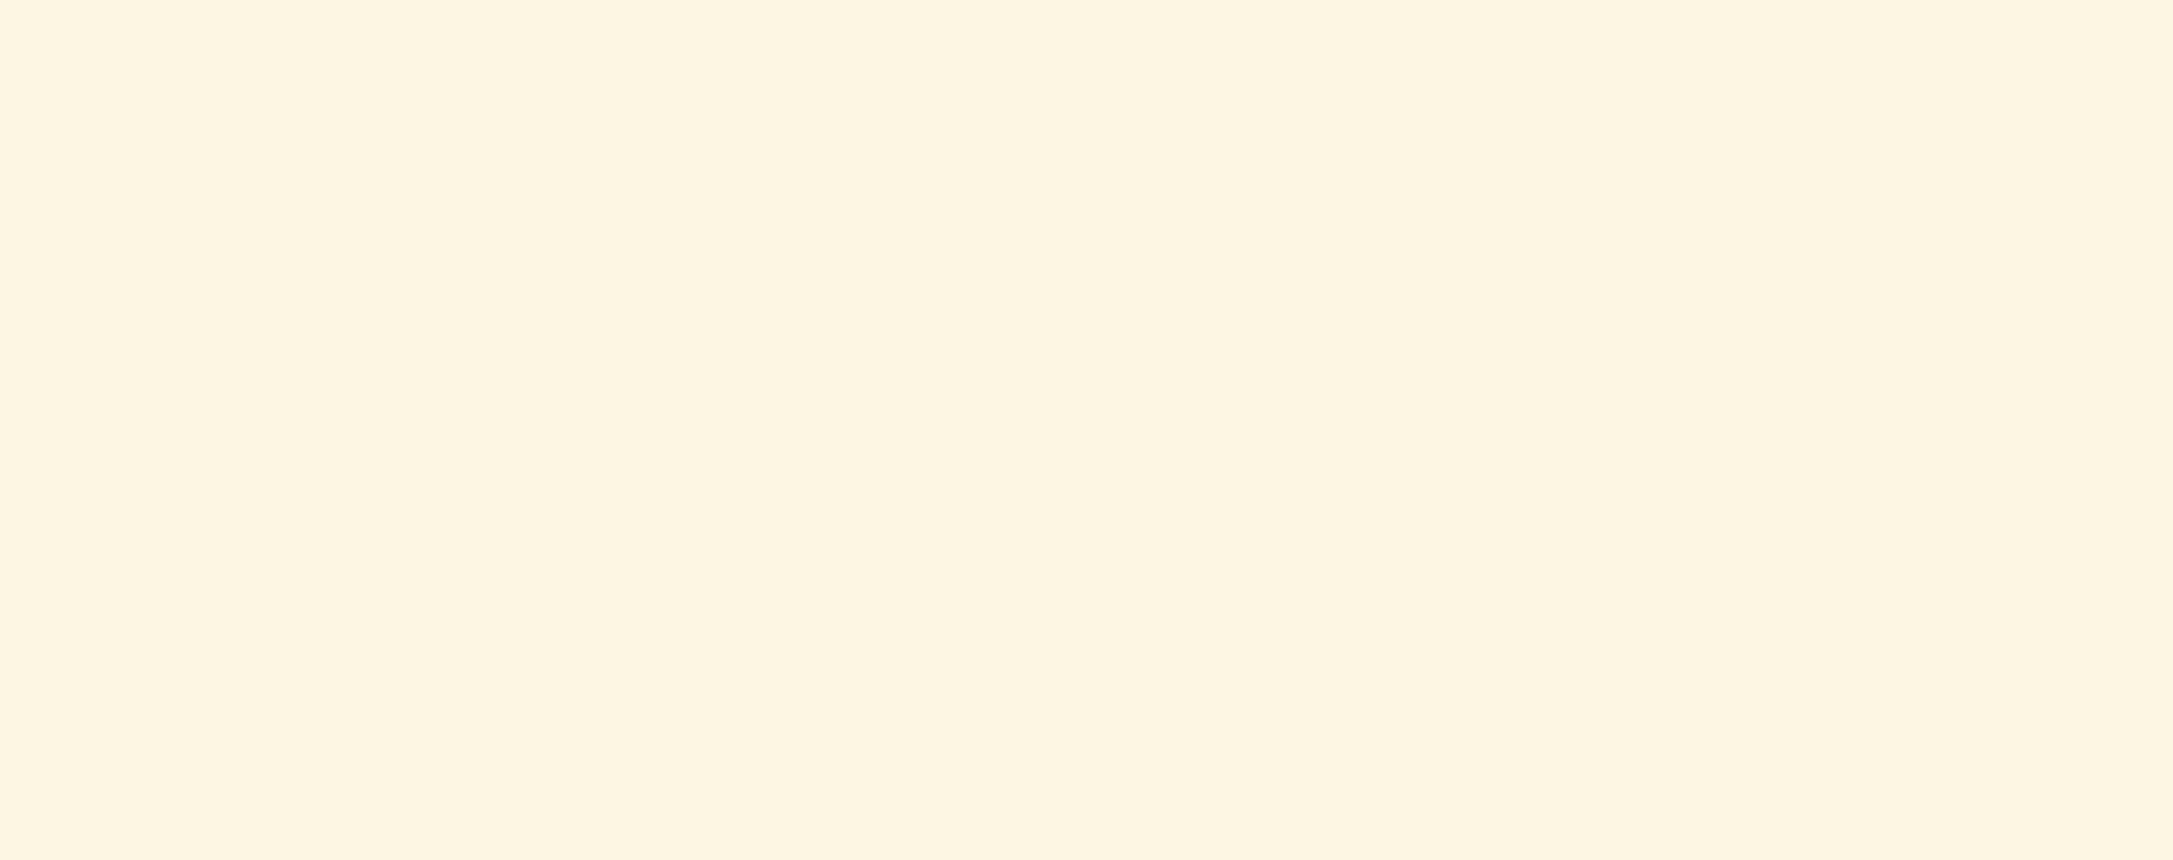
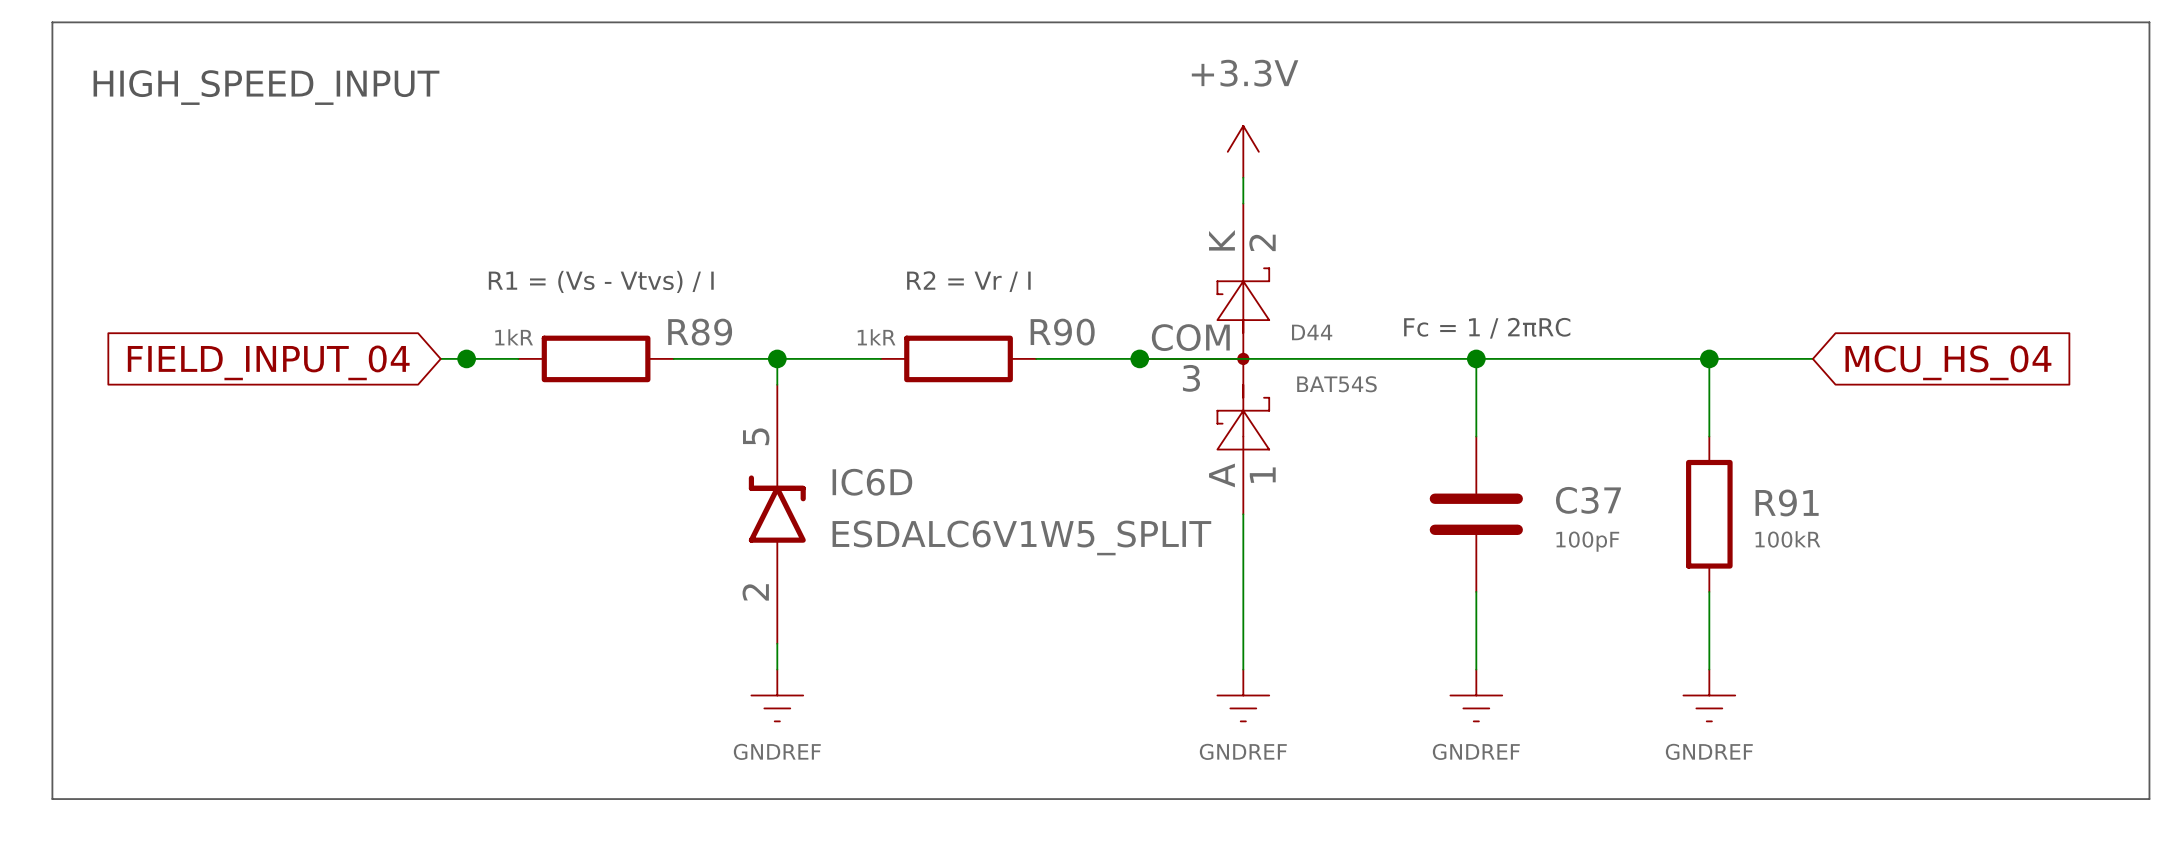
line: none -> (52, 22) (2149, 22) (2149, 799) (52, 799) (52, 22)
text: none -> HIGH_SPEED_INPUT (266, 87)
power symbol: none -> +3.3V (1243, 151)
wire: none -> (1243, 177) (1243, 203)
text: none -> R1 = (Vs - Vtvs) / I (601, 281)
text: none -> R2 = Vr / I (968, 281)
text: none -> Fc = 1 / 2πRC (1487, 328)
wire: none -> (440, 358) (518, 358)
junction: none -> (466, 358)
R89: none -> 1kR (596, 358)
wire: none -> (673, 358) (880, 358)
wire: none -> (777, 358) (777, 384)
junction: none -> (777, 358)
R90: none -> 1kR (958, 358)
wire: none -> (1036, 358) (1812, 358)
junction: none -> (1139, 358)
D44: none -> BAT54S (1204, 358)
wire: none -> (1476, 358) (1476, 436)
junction: none -> (1476, 358)
wire: none -> (1709, 358) (1709, 436)
junction: none -> (1709, 358)
global label: none -> FIELD_INPUT_04 (268, 362)
global label: none -> MCU_HS_04 (1948, 362)
IC6D: none -> ESDALC6V1W5_SPLIT (777, 514)
wire: none -> (1243, 514) (1243, 669)
C37: none -> 100pF (1476, 514)
R91: none -> 100kR (1709, 514)
wire: none -> (1476, 591) (1476, 669)
wire: none -> (1709, 591) (1709, 669)
wire: none -> (777, 643) (777, 669)
power symbol: none -> GNDREF (777, 695)
power symbol: none -> GNDREF (1243, 695)
power symbol: none -> GNDREF (1476, 695)
power symbol: none -> GNDREF (1709, 695)

